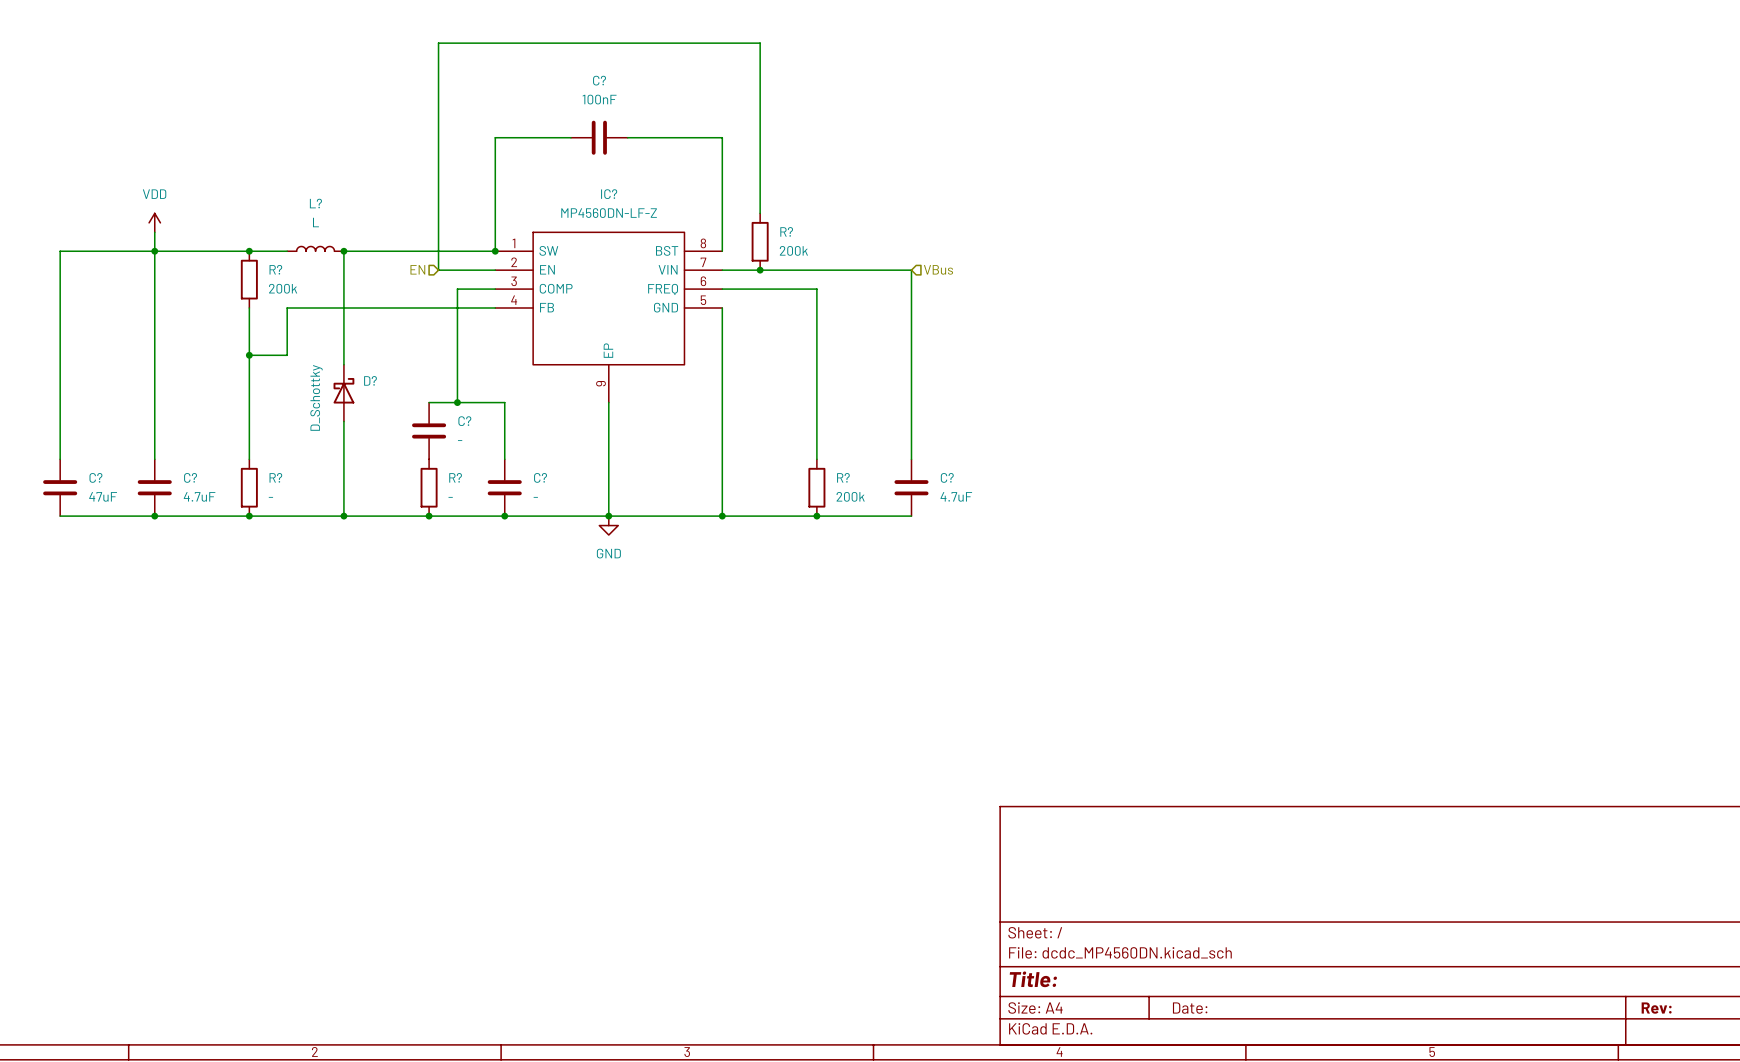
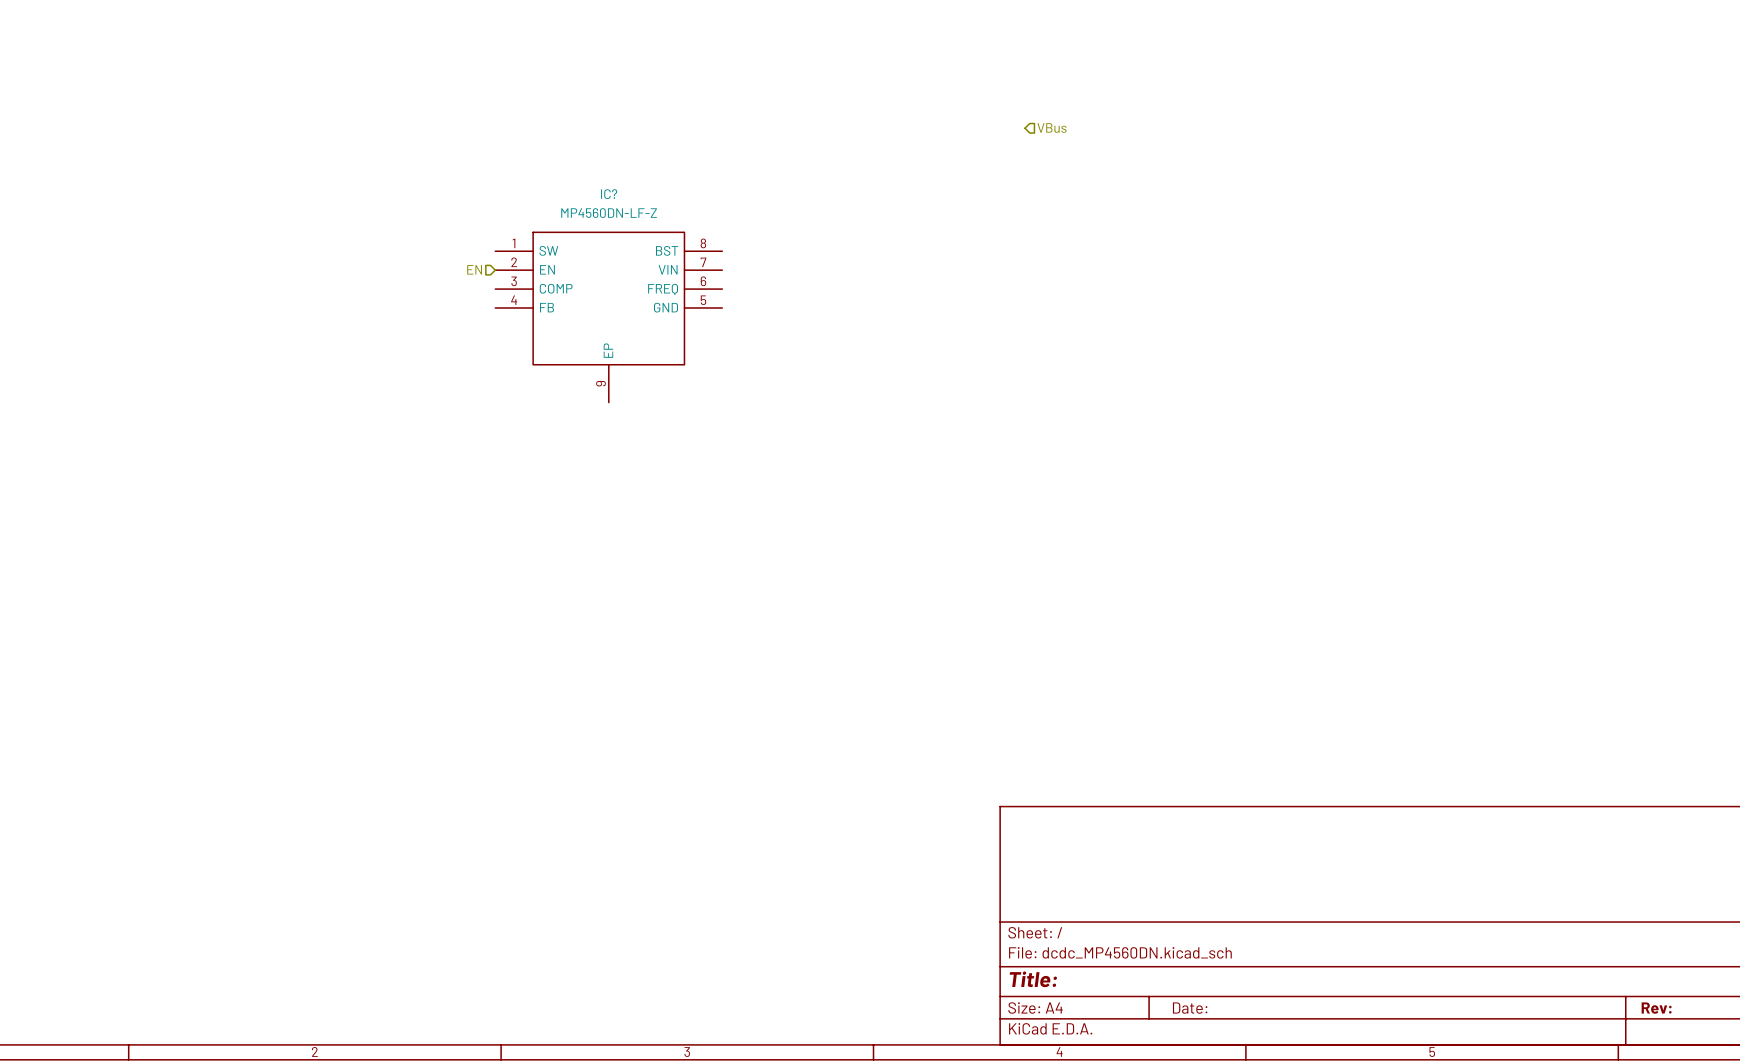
wire: (570, 137) (495, 137) (495, 251) (343, 251) (343, 364) -> none
C?: 100nF (599, 137) -> none
wire: (627, 137) (722, 137) (722, 251) -> none
wire: (760, 213) (760, 43) (438, 43) (438, 270) (495, 270) -> none
power symbol: VDD (154, 222) -> none
wire: (154, 232) (154, 459) -> none
R?: 200k (760, 241) -> none
L?: L (315, 248) -> none
junction: (154, 251) -> none
junction: (249, 251) -> none
wire: (287, 251) (60, 251) (60, 459) -> none
junction: (343, 251) -> none
junction: (495, 251) -> none
hierarchical label position: EN (417, 269) -> EN (474, 269)
hierarchical label position: VBus (938, 269) -> VBus (1052, 127)
wire: (722, 270) (911, 270) (911, 459) -> none
junction: (760, 270) -> none
R?: 200k (249, 279) -> none
wire: (495, 289) (457, 289) (457, 402) -> none
wire: (722, 289) (816, 289) (816, 459) -> none
wire: (249, 308) (249, 459) -> none
wire: (495, 308) (287, 308) (287, 355) (249, 355) -> none
wire: (722, 308) (722, 516) -> none
junction: (249, 355) -> none
D?: D_Schottky (343, 393) -> none
wire: (429, 402) (504, 402) (504, 459) -> none
junction: (457, 402) -> none
wire: (608, 402) (608, 516) -> none
wire: (343, 421) (343, 516) -> none
C?: - (429, 430) -> none
C?: 47uF (60, 487) -> none
C?: 4.7uF (154, 487) -> none
R?: - (249, 487) -> none
R?: - (429, 487) -> none
C?: - (504, 487) -> none
R?: 200k (816, 487) -> none
C?: 4.7uF (911, 487) -> none
wire: (60, 516) (911, 516) -> none
junction: (154, 516) -> none
junction: (249, 516) -> none
junction: (343, 516) -> none
junction: (429, 516) -> none
junction: (504, 516) -> none
junction: (608, 516) -> none
junction: (722, 516) -> none
junction: (816, 516) -> none
power symbol: GND (608, 525) -> none

